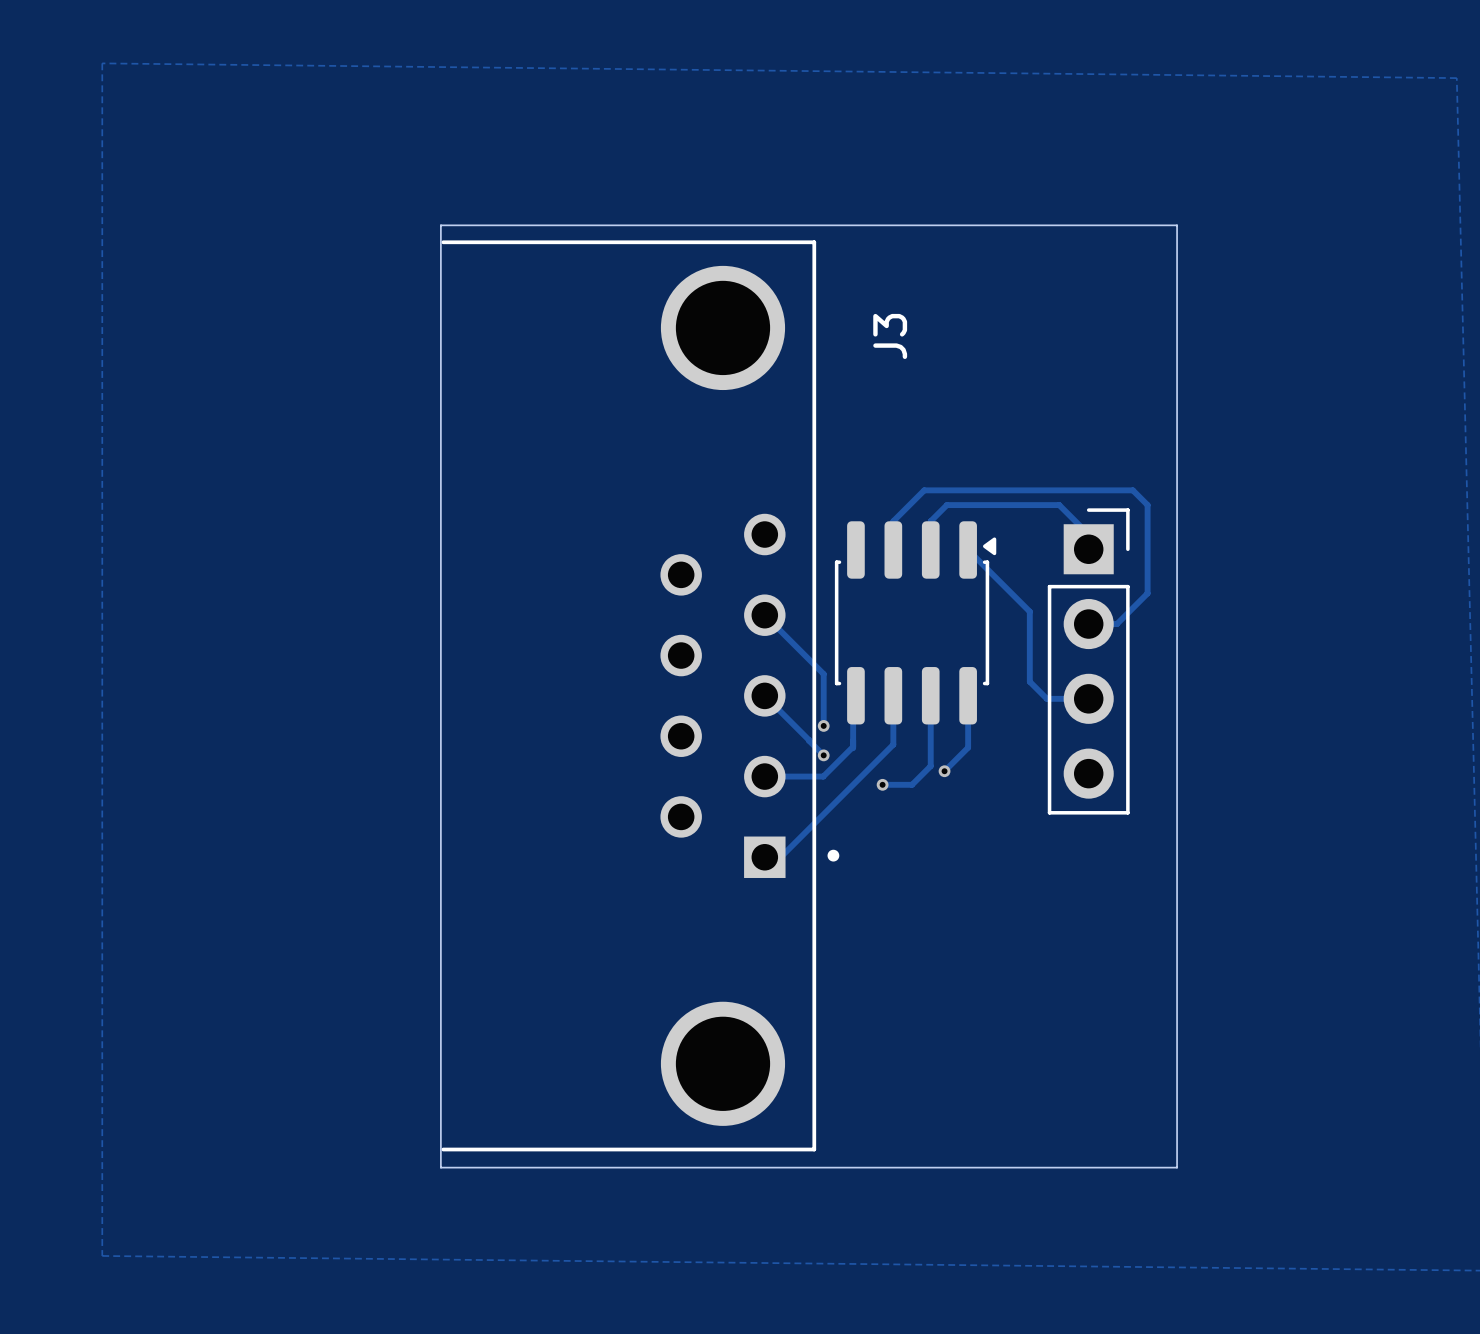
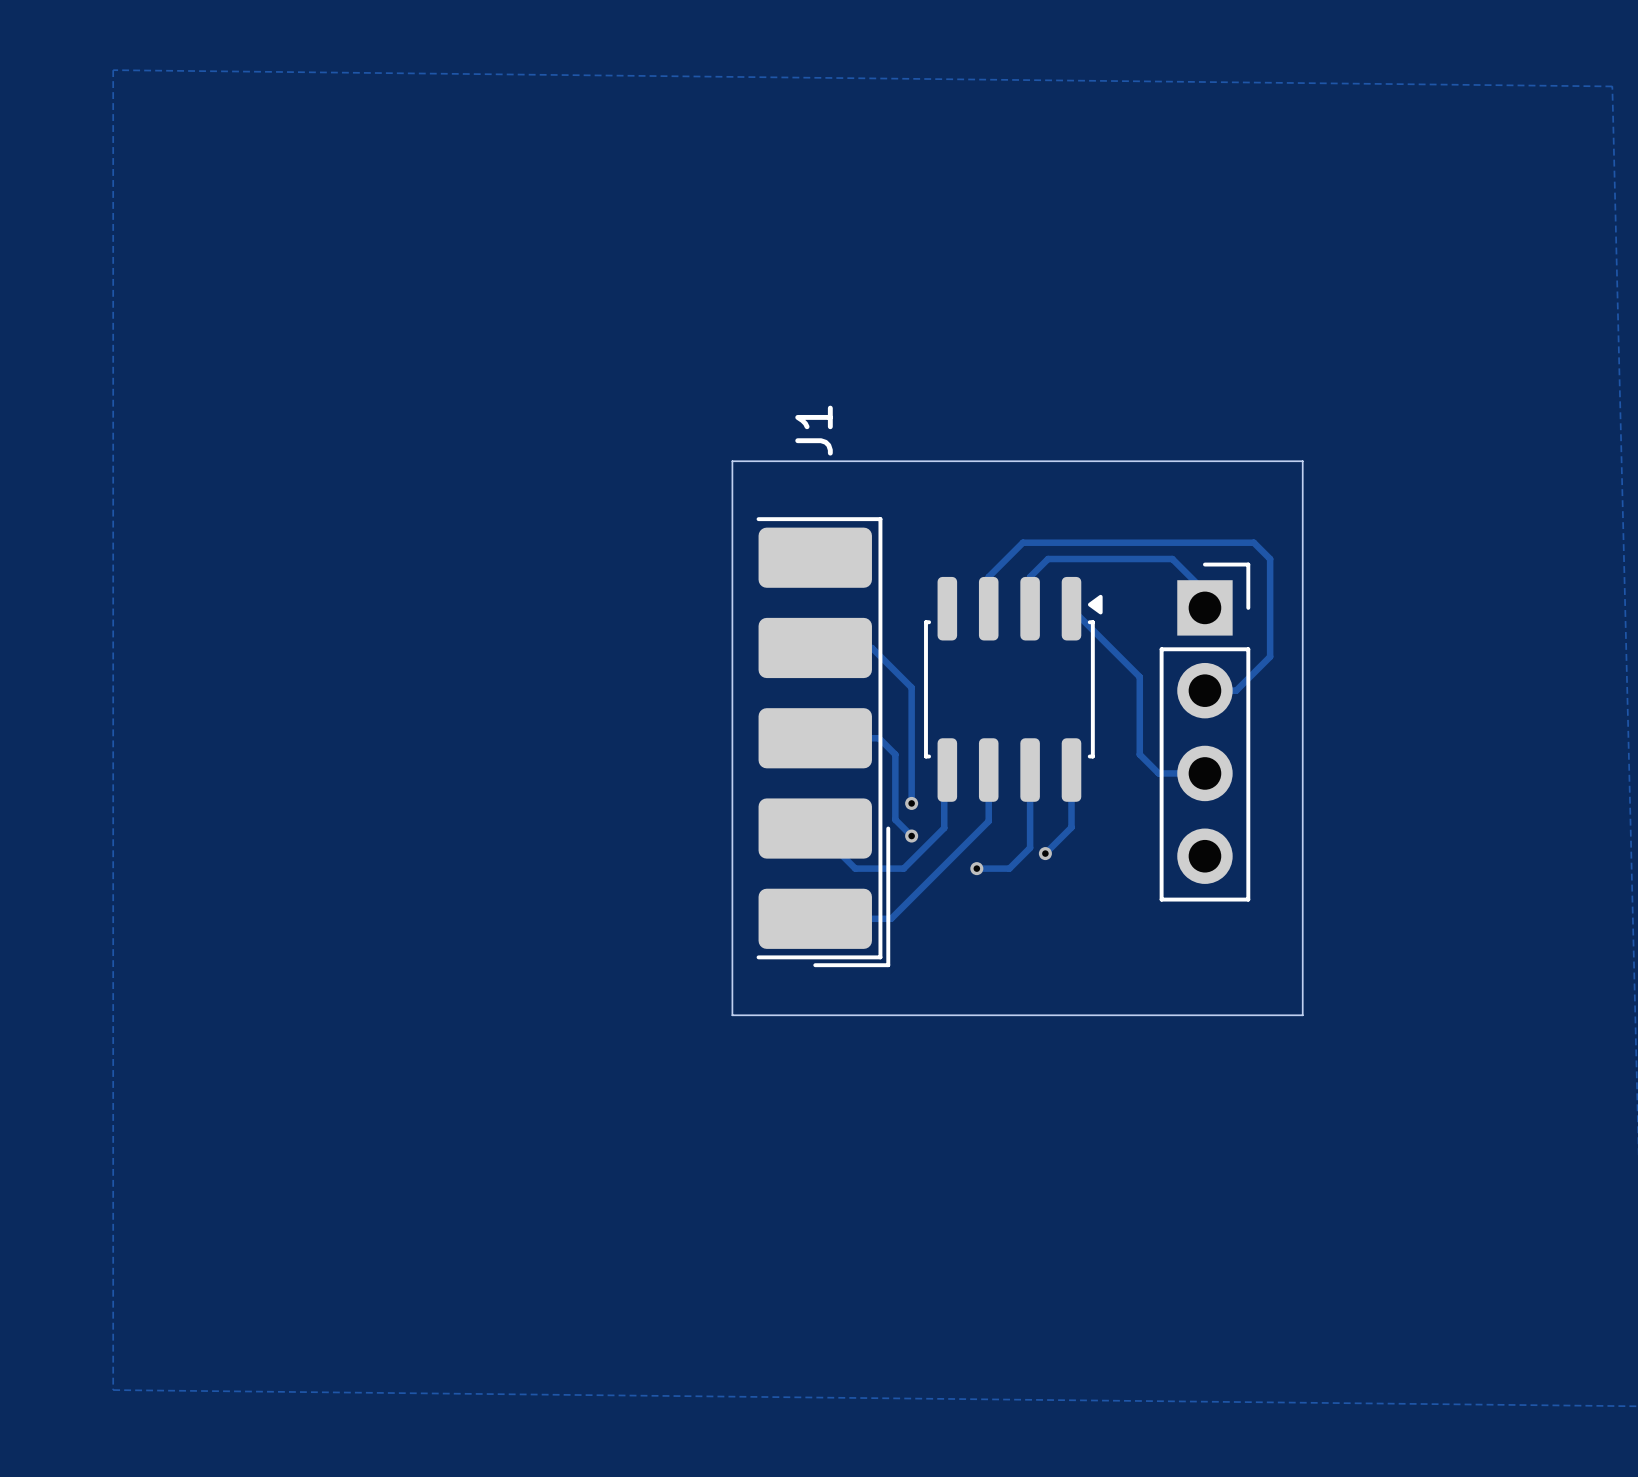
board edge: (1177, 416) (1177, 225) (440, 225) (440, 1167) (1177, 1167) (1177, 917) -> (1302, 461) (732, 461) (732, 1015) (1302, 1015)
track: (764, 615) (823, 674) -> (815, 647) (871, 647) (911, 687) (911, 746)
J1: none -> (823, 742)
J3: (640, 695) -> none
track: (764, 695) (808, 740) -> (815, 738) (879, 738) (895, 754) (895, 819)
track: (893, 742) (893, 744) (780, 857) (764, 857) -> (988, 821) (891, 918) (815, 918)
track: (853, 746) (823, 776) (764, 776) -> none
track: none -> (944, 828) (903, 868) (855, 868) (815, 828)

